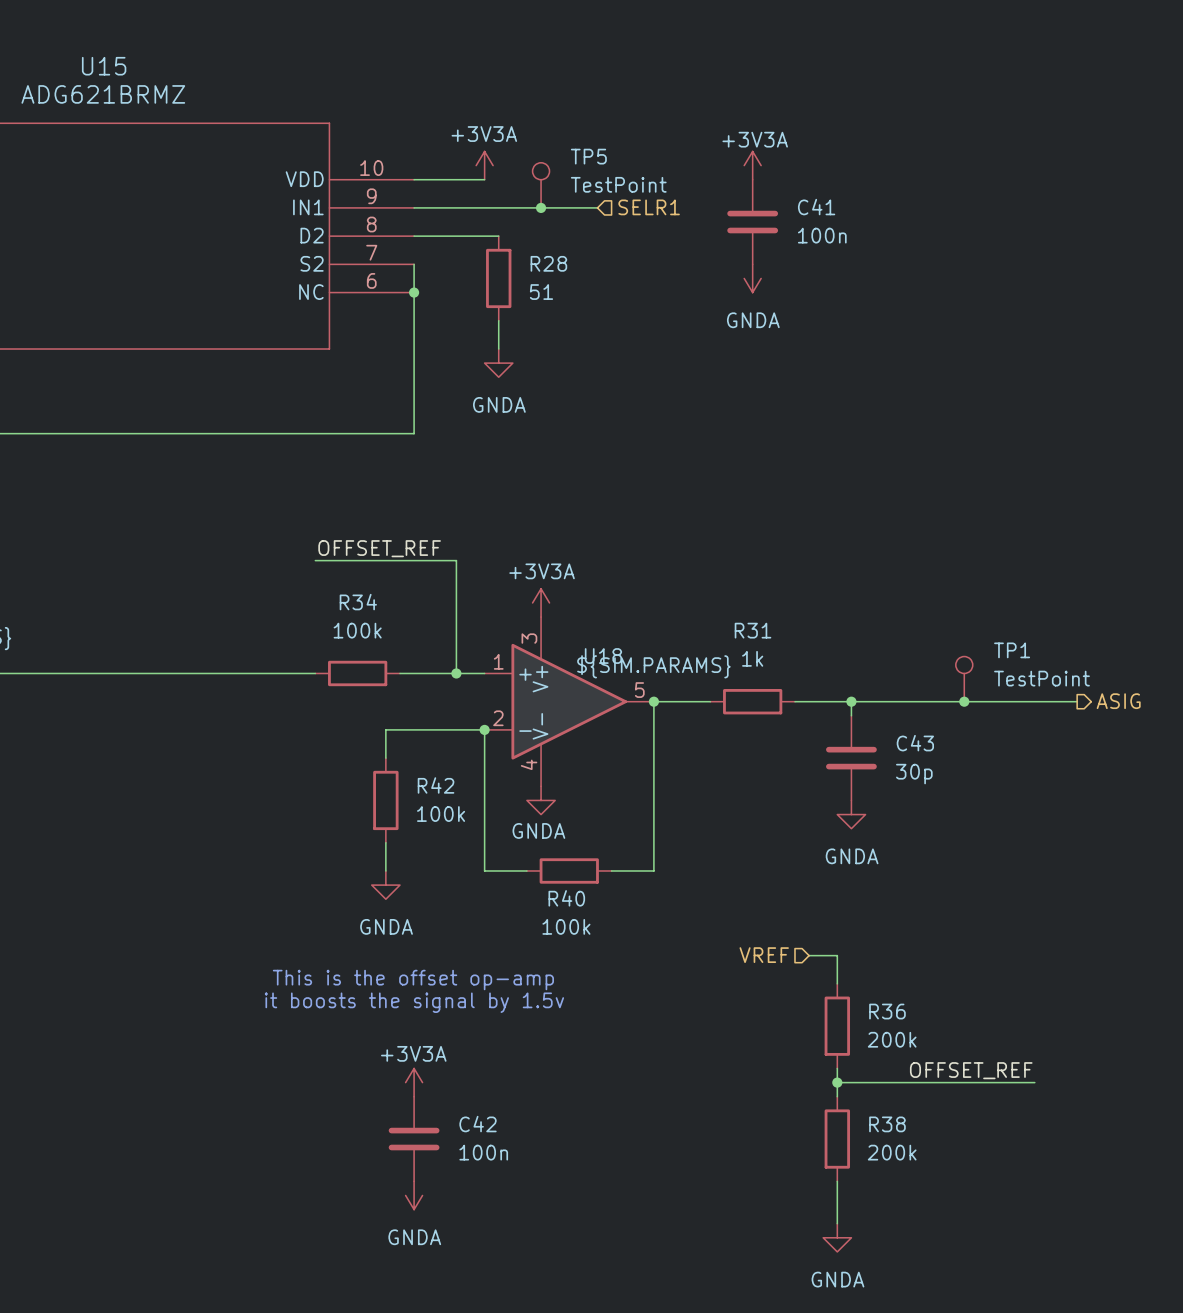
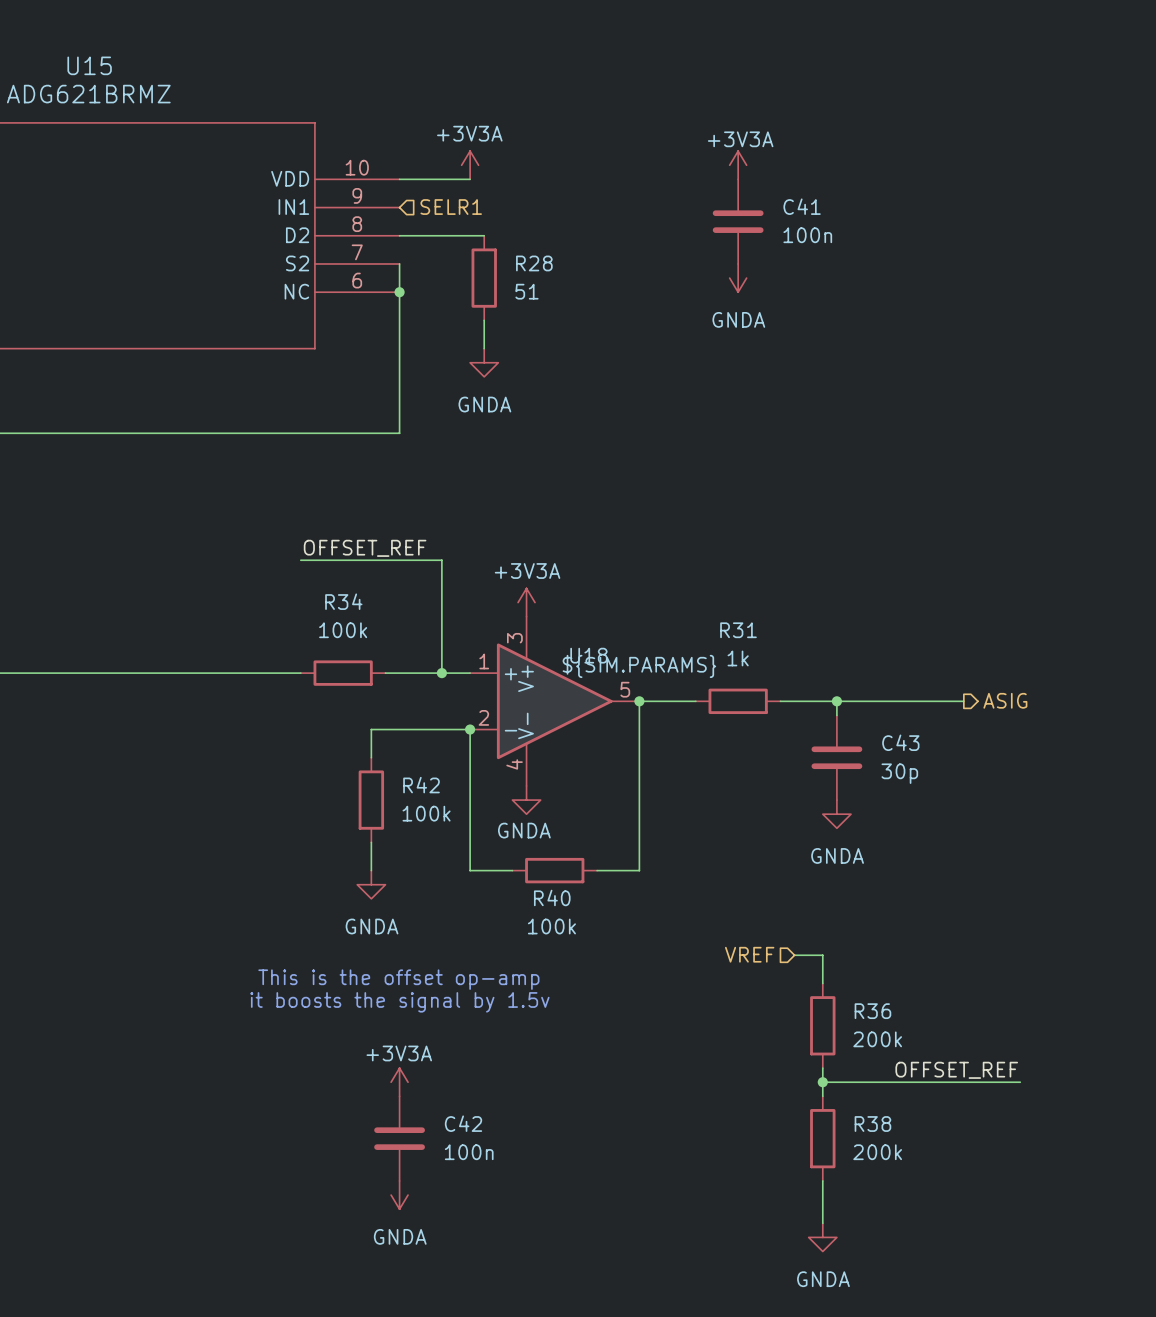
TP5: TestPoint (541, 185) -> none
wire: (414, 207) (597, 207) -> none
junction: (541, 207) -> none
hierarchical label position: SELR1 (649, 207) -> SELR1 (451, 207)
TP1: TestPoint (964, 679) -> none
junction: (964, 701) -> none
wire: (978, 701) (1077, 701) -> none
hierarchical label position: ASIG (1118, 701) -> ASIG (1005, 700)

